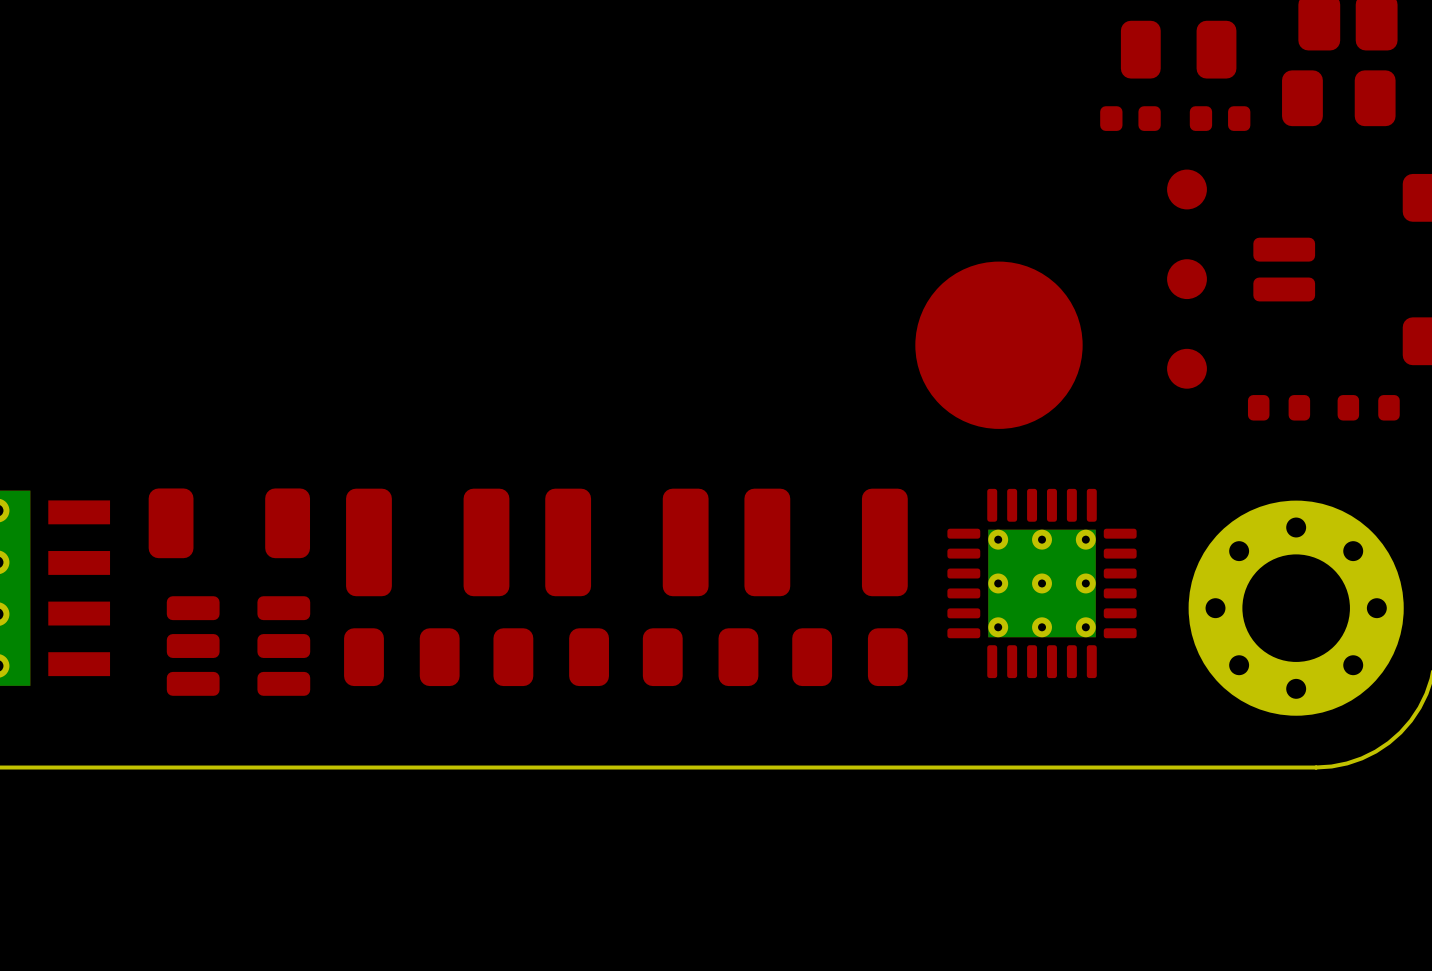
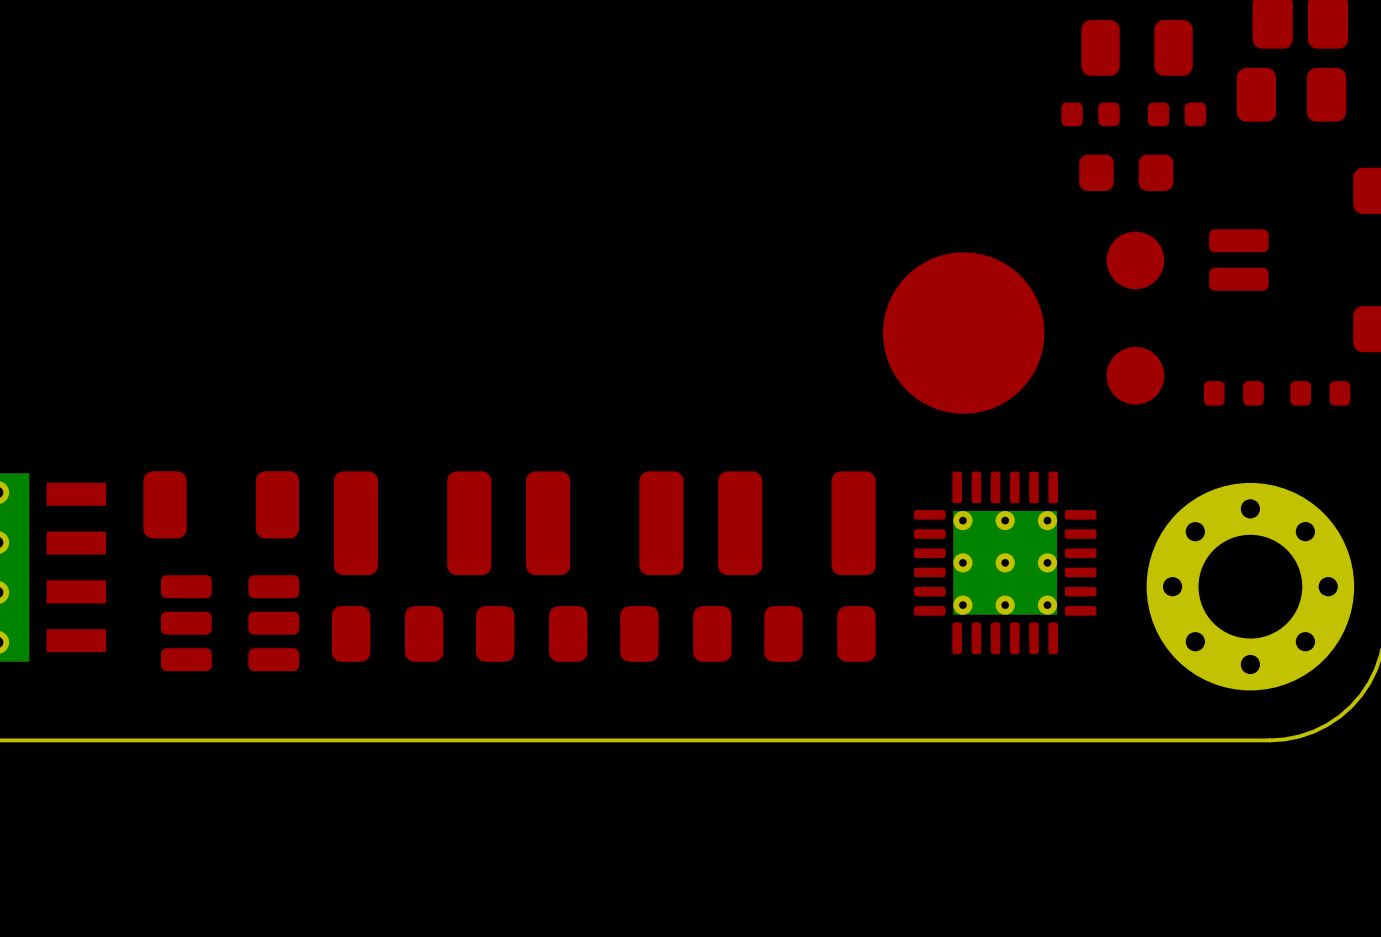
part footprint: [1167, 169, 1207, 210] -> [1079, 154, 1174, 192]
part footprint: [1167, 259, 1207, 300] -> [1106, 231, 1165, 290]
part footprint: [1167, 348, 1207, 389] -> [1106, 346, 1165, 405]

